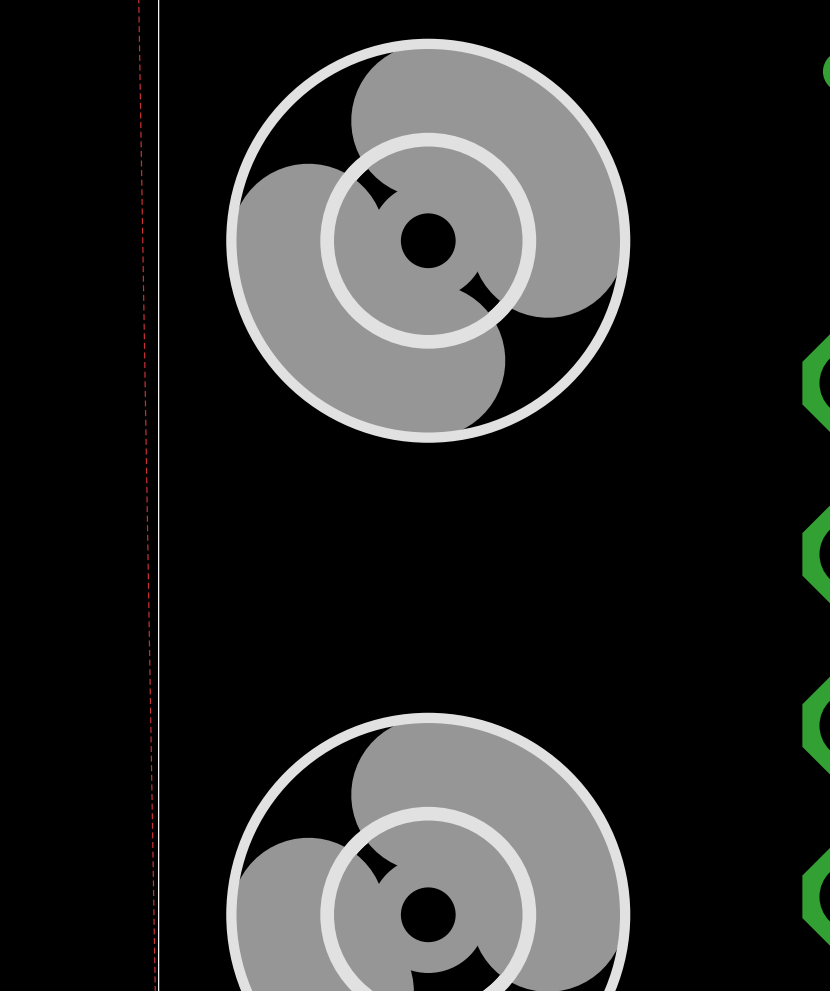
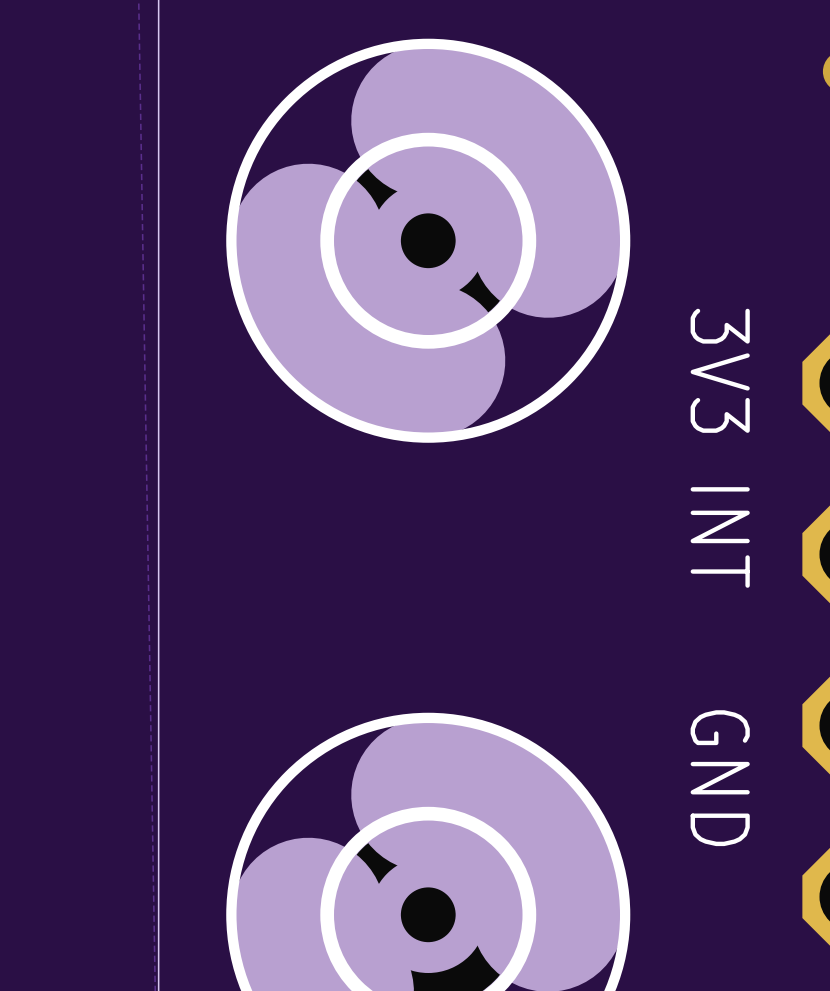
text: none -> 3V3 INT GND (720, 577)

